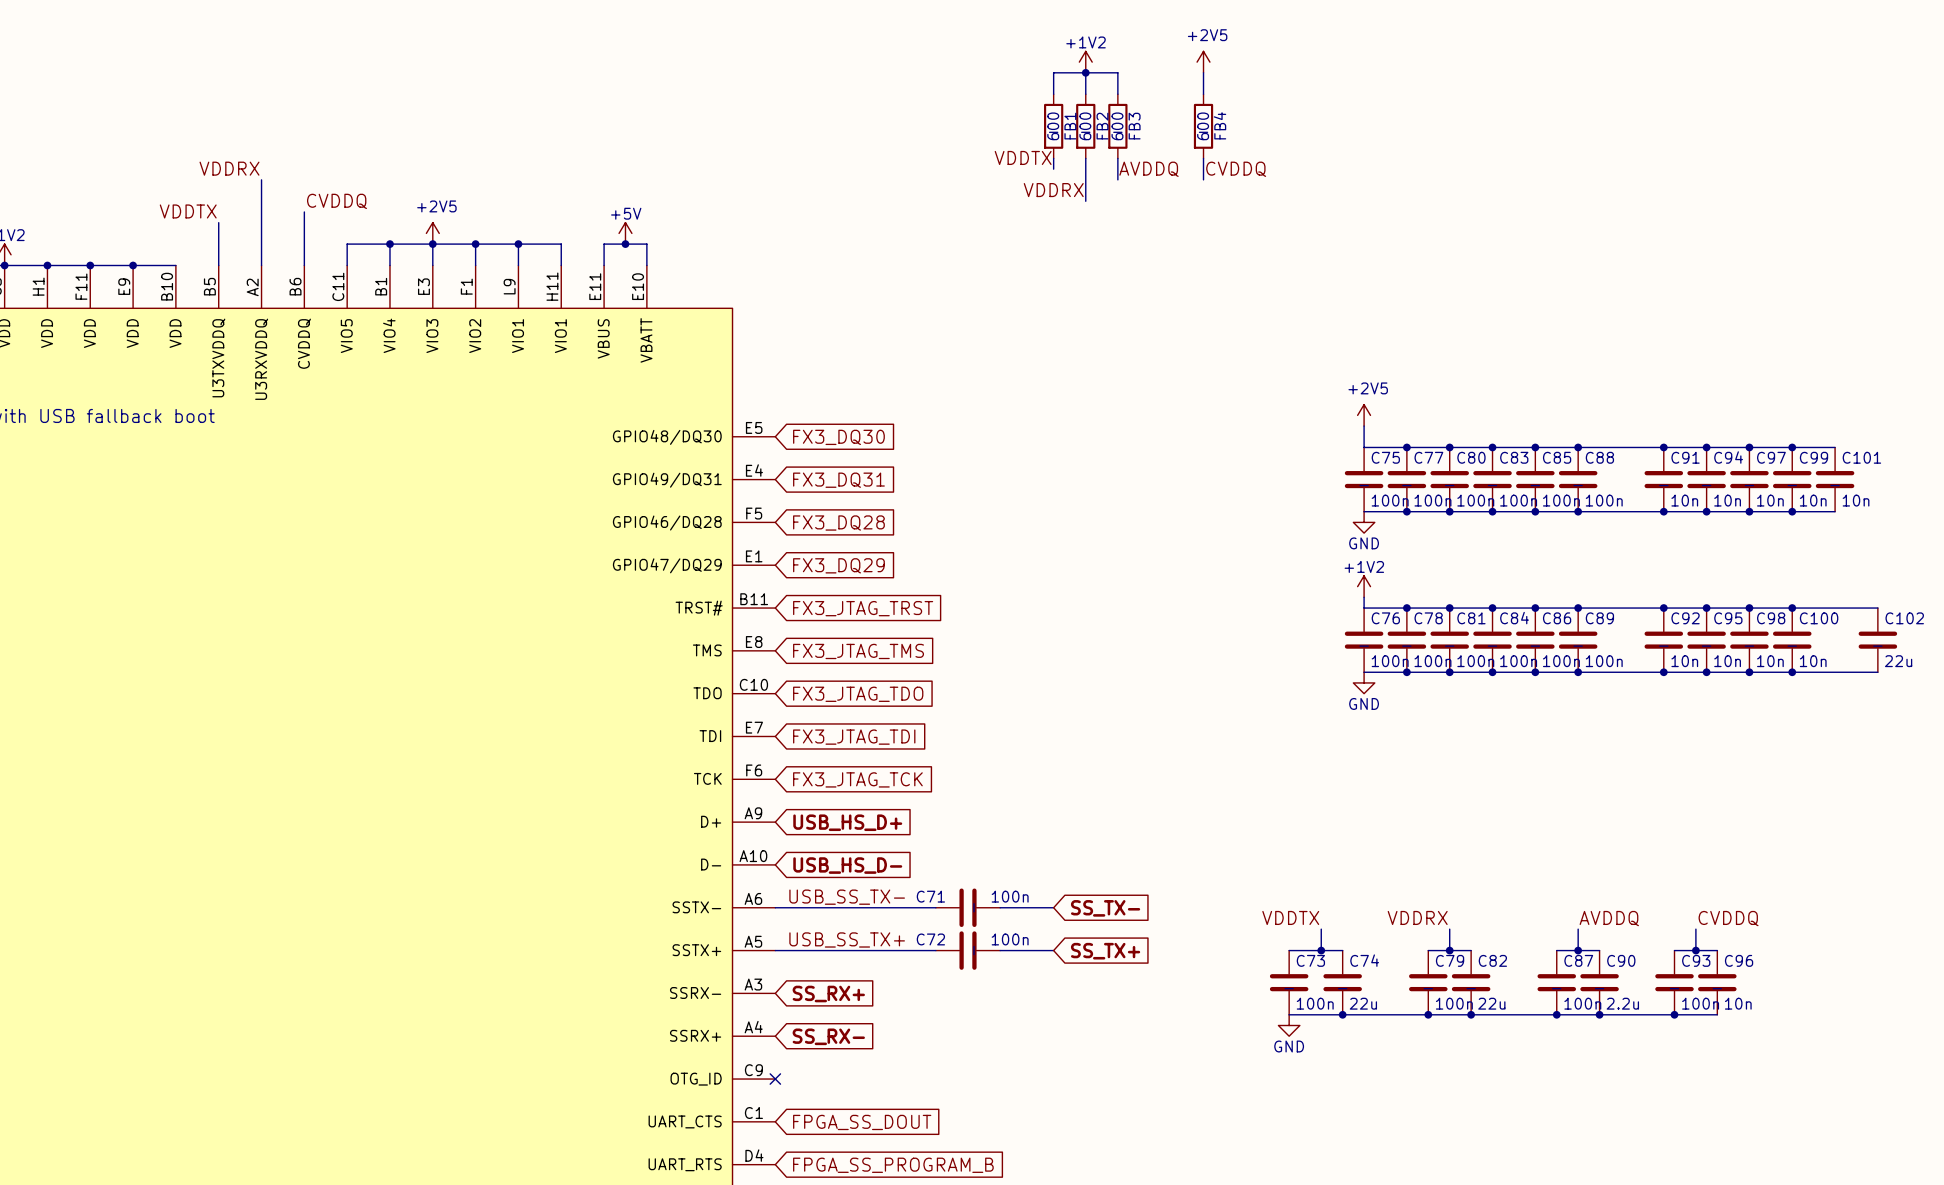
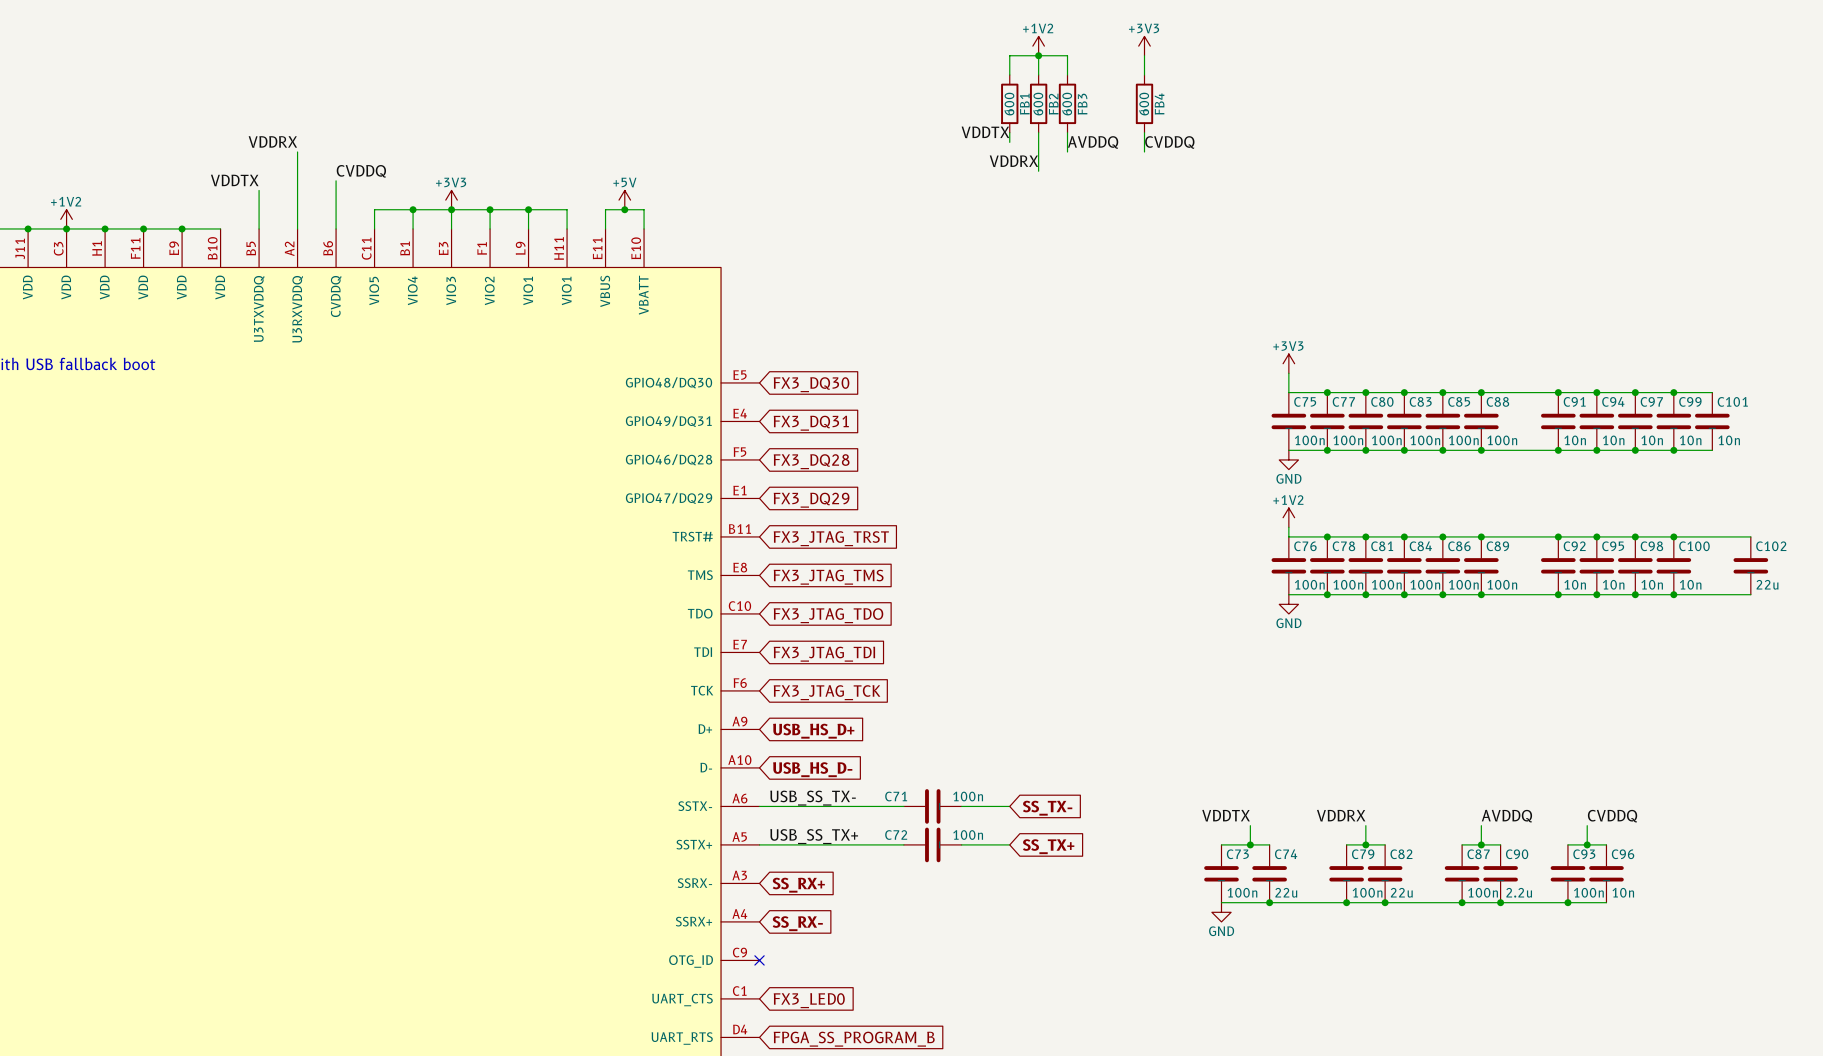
power symbol: +2V5 (1203, 62) -> +3V3 (1144, 46)
power symbol: +2V5 (432, 233) -> +3V3 (451, 200)
power symbol: +2V5 (1364, 415) -> +3V3 (1288, 363)
global label: FPGA_SS_DOUT (862, 1122) -> FX3_LED0 (809, 1000)

